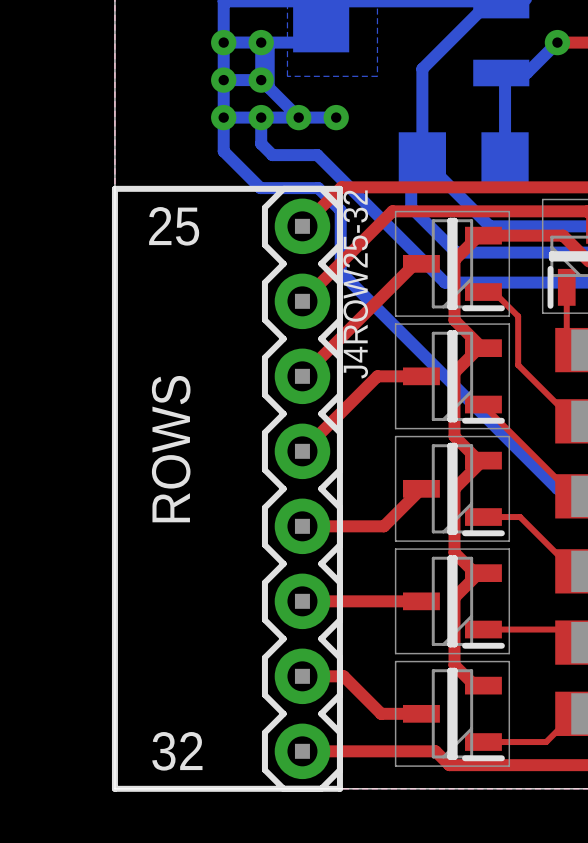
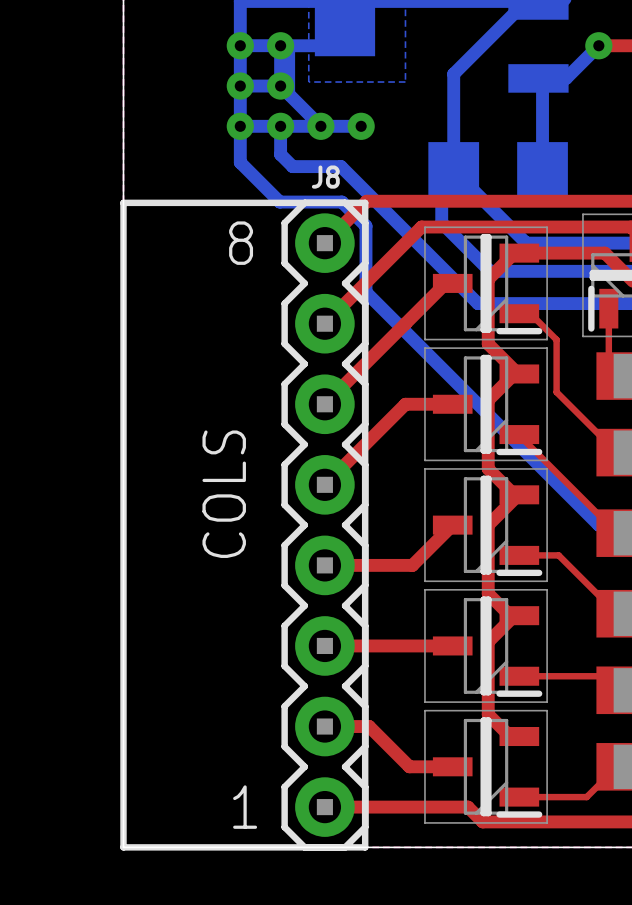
text: 25 (174, 226) -> none
text: none -> 8 (241, 243)
J4ROW25-32 name: J4ROW25-32 (355, 284) -> J8 (325, 177)
text: ROWS (171, 449) -> none
text: none -> COLS (224, 494)
text: 32 (177, 751) -> none
text: none -> 1 (245, 807)

